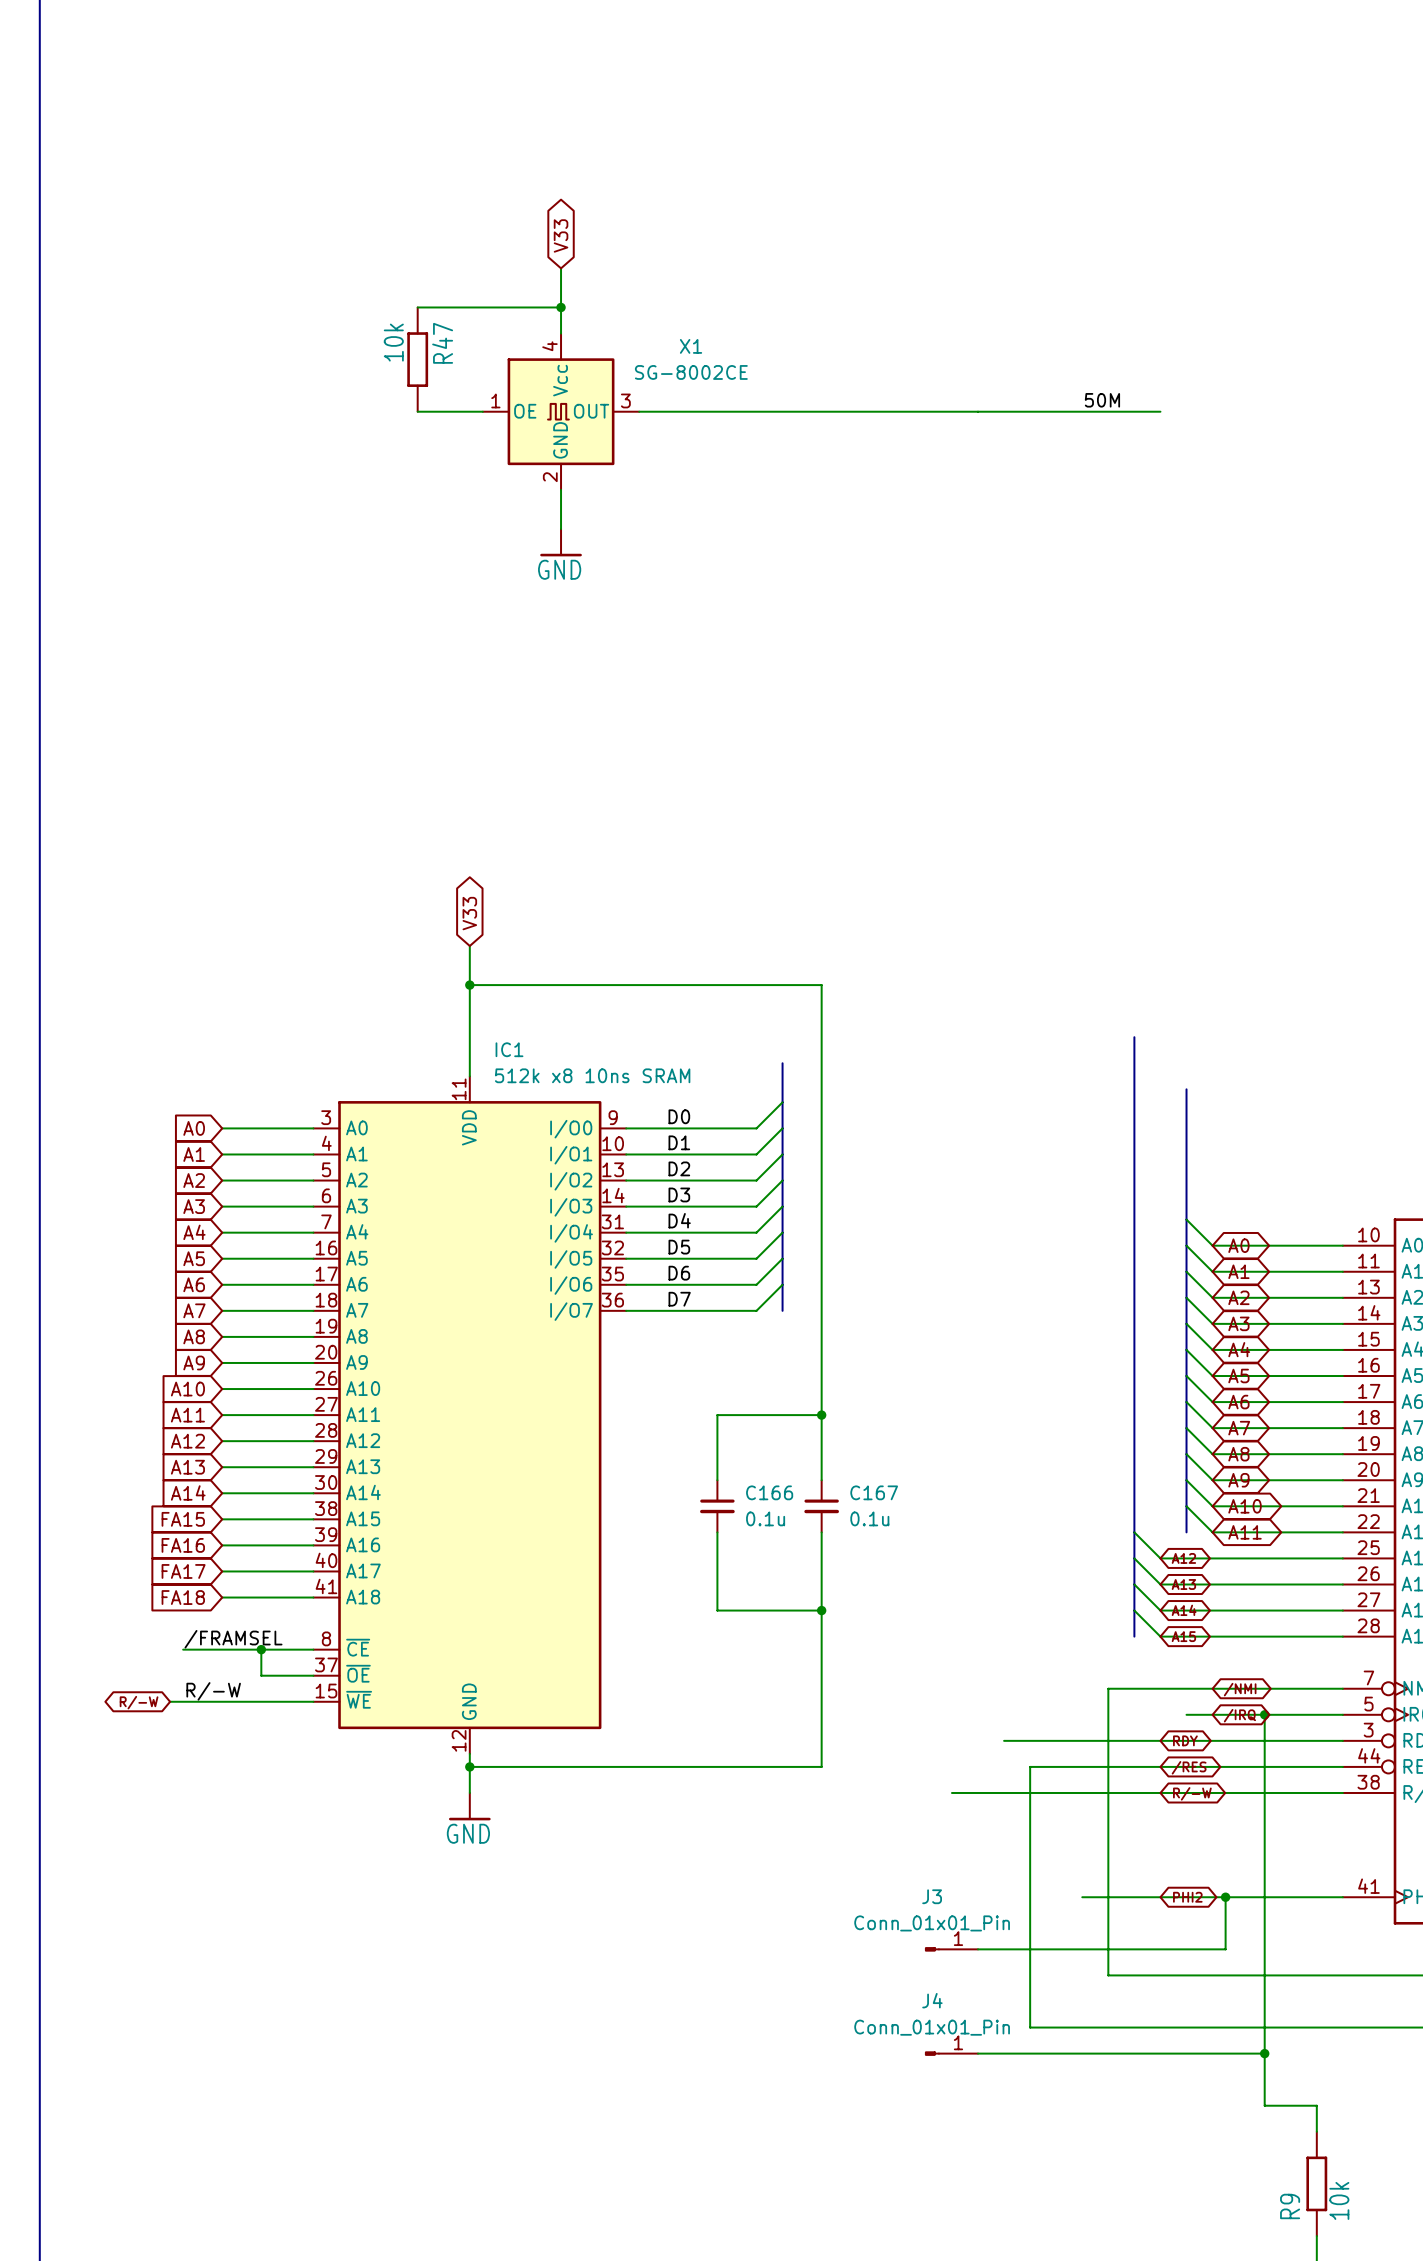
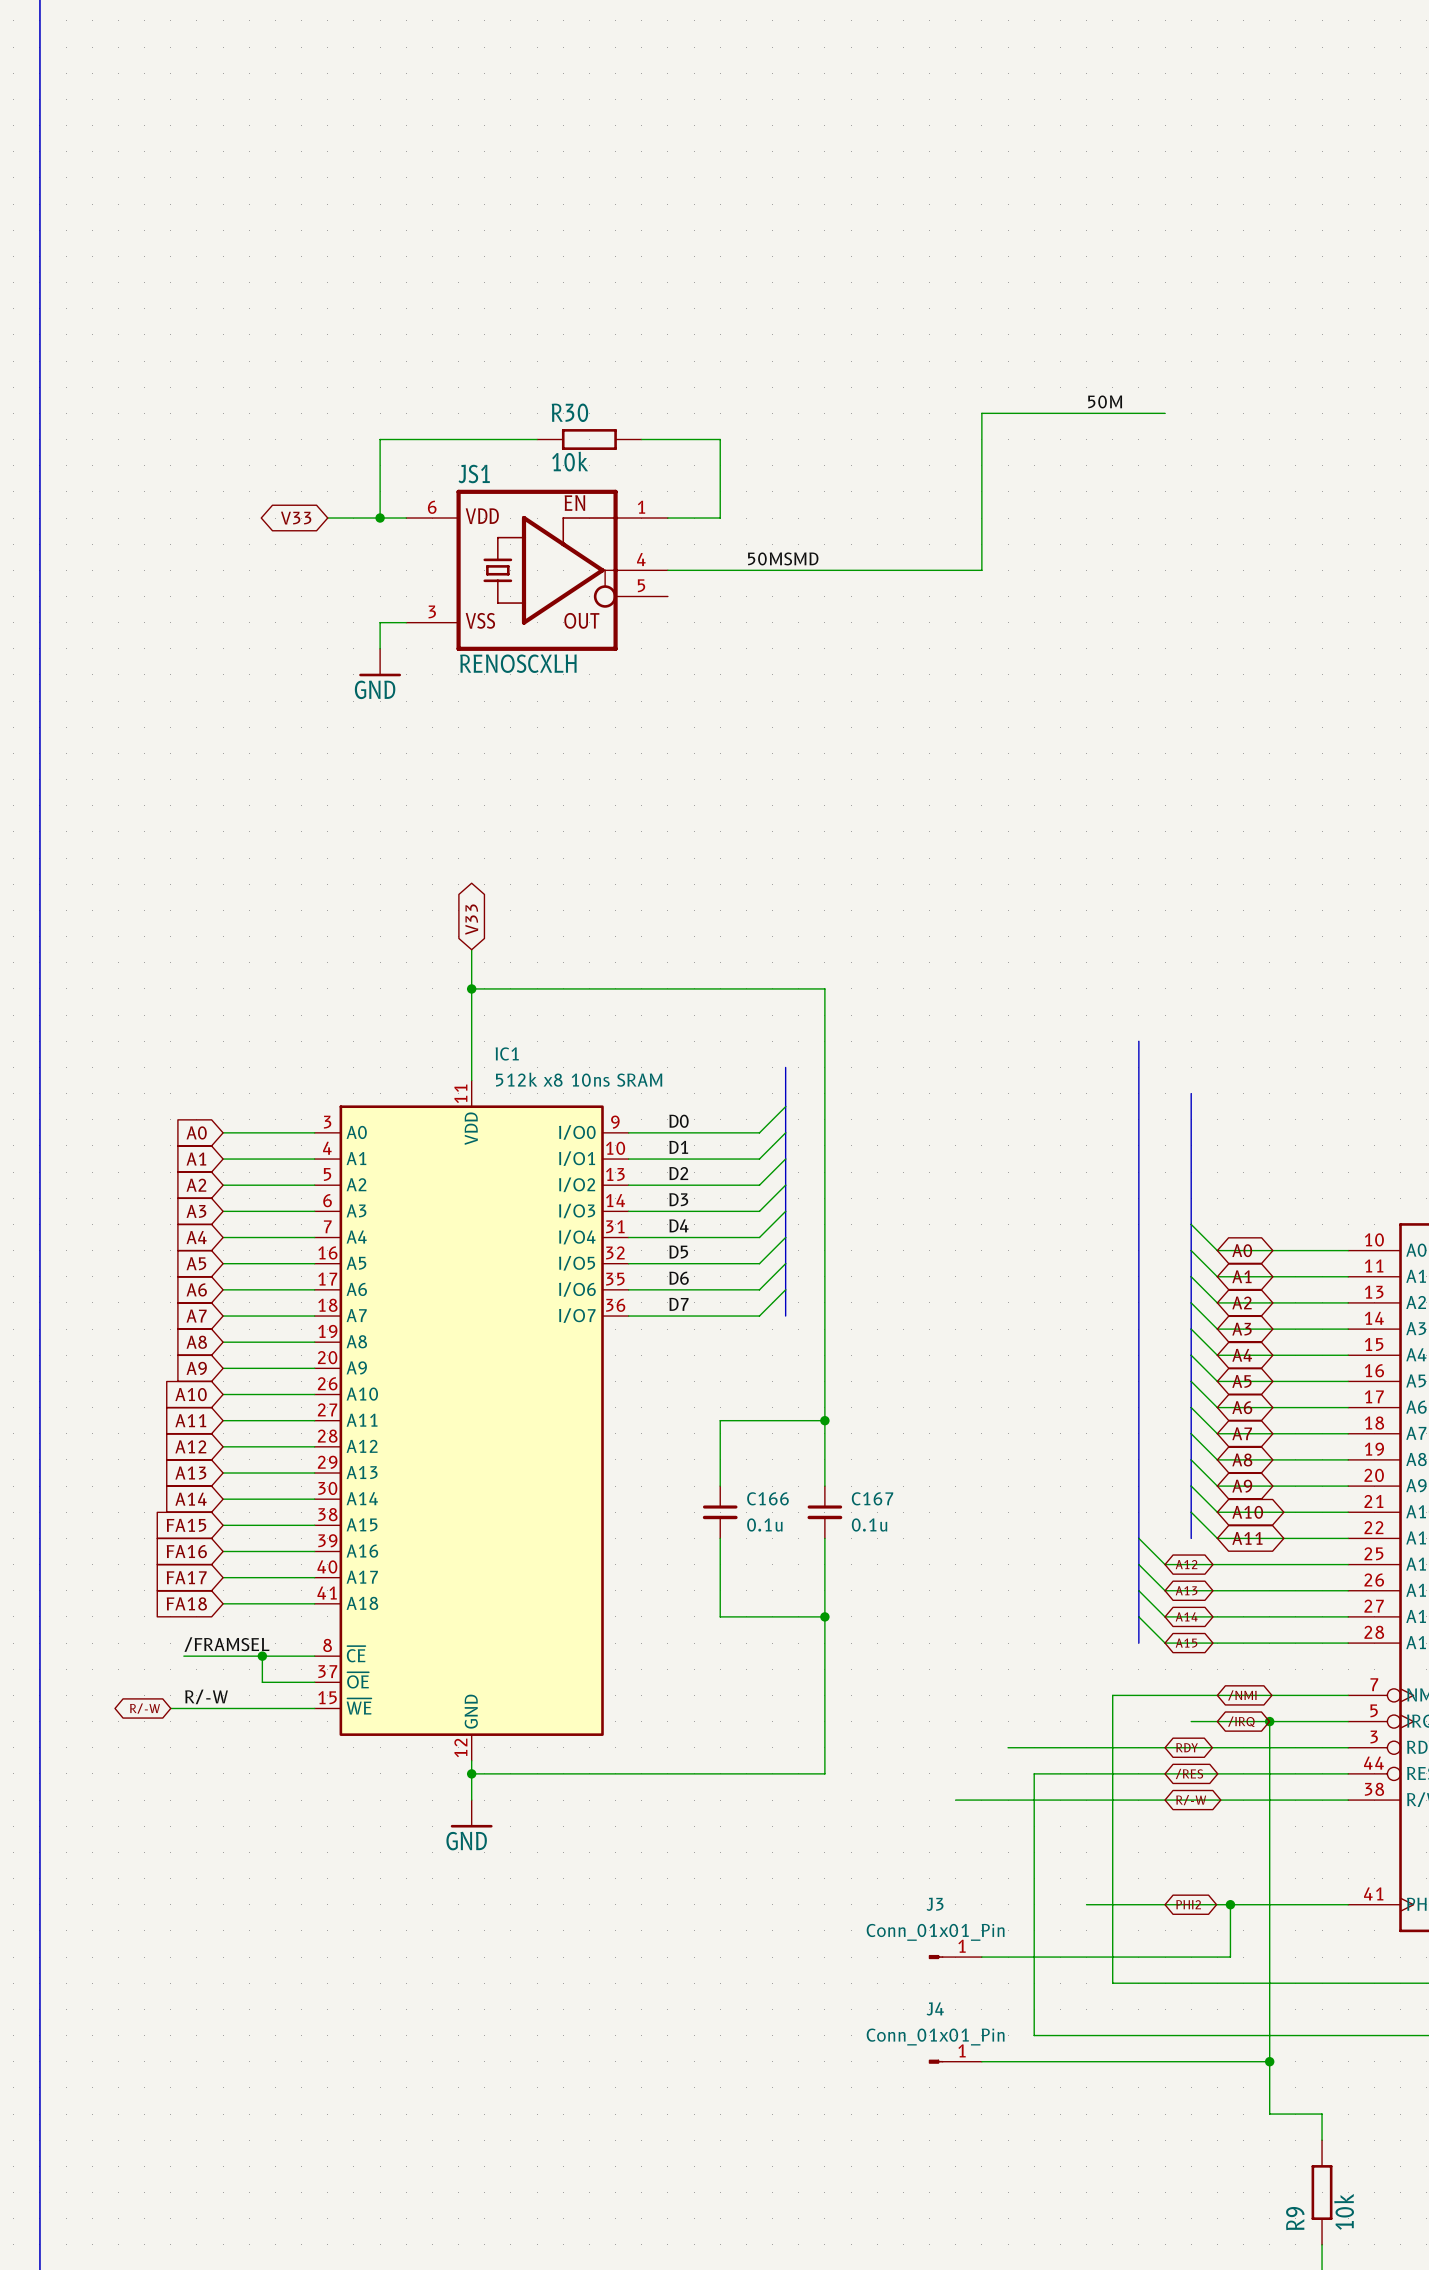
global label: V33 (561, 235) -> none
wire: (561, 268) (561, 333) -> none
wire: (417, 307) (561, 307) -> none
junction: (561, 307) -> none
R47: 10k (417, 359) -> none
wire: (417, 411) (482, 411) -> none
X1: SG-8002CE (561, 411) -> none
wire: (639, 411) (978, 411) -> (667, 570) (981, 570) (981, 413)
wire: none -> (537, 439) (380, 439) (380, 518)
R30: none -> 10k (589, 439)
wire: none -> (641, 439) (720, 439) (720, 518) (667, 518)
wire: (561, 489) (561, 529) -> none
global label: none -> V33 (296, 518)
wire: none -> (327, 518) (406, 518)
junction: none -> (380, 518)
power symbol position: GND (561, 542) -> GND (380, 662)
label: none -> 50MSMD (783, 558)
JS1: none -> RENOSCXLH (537, 570)
wire: none -> (406, 622) (380, 622) (380, 648)

